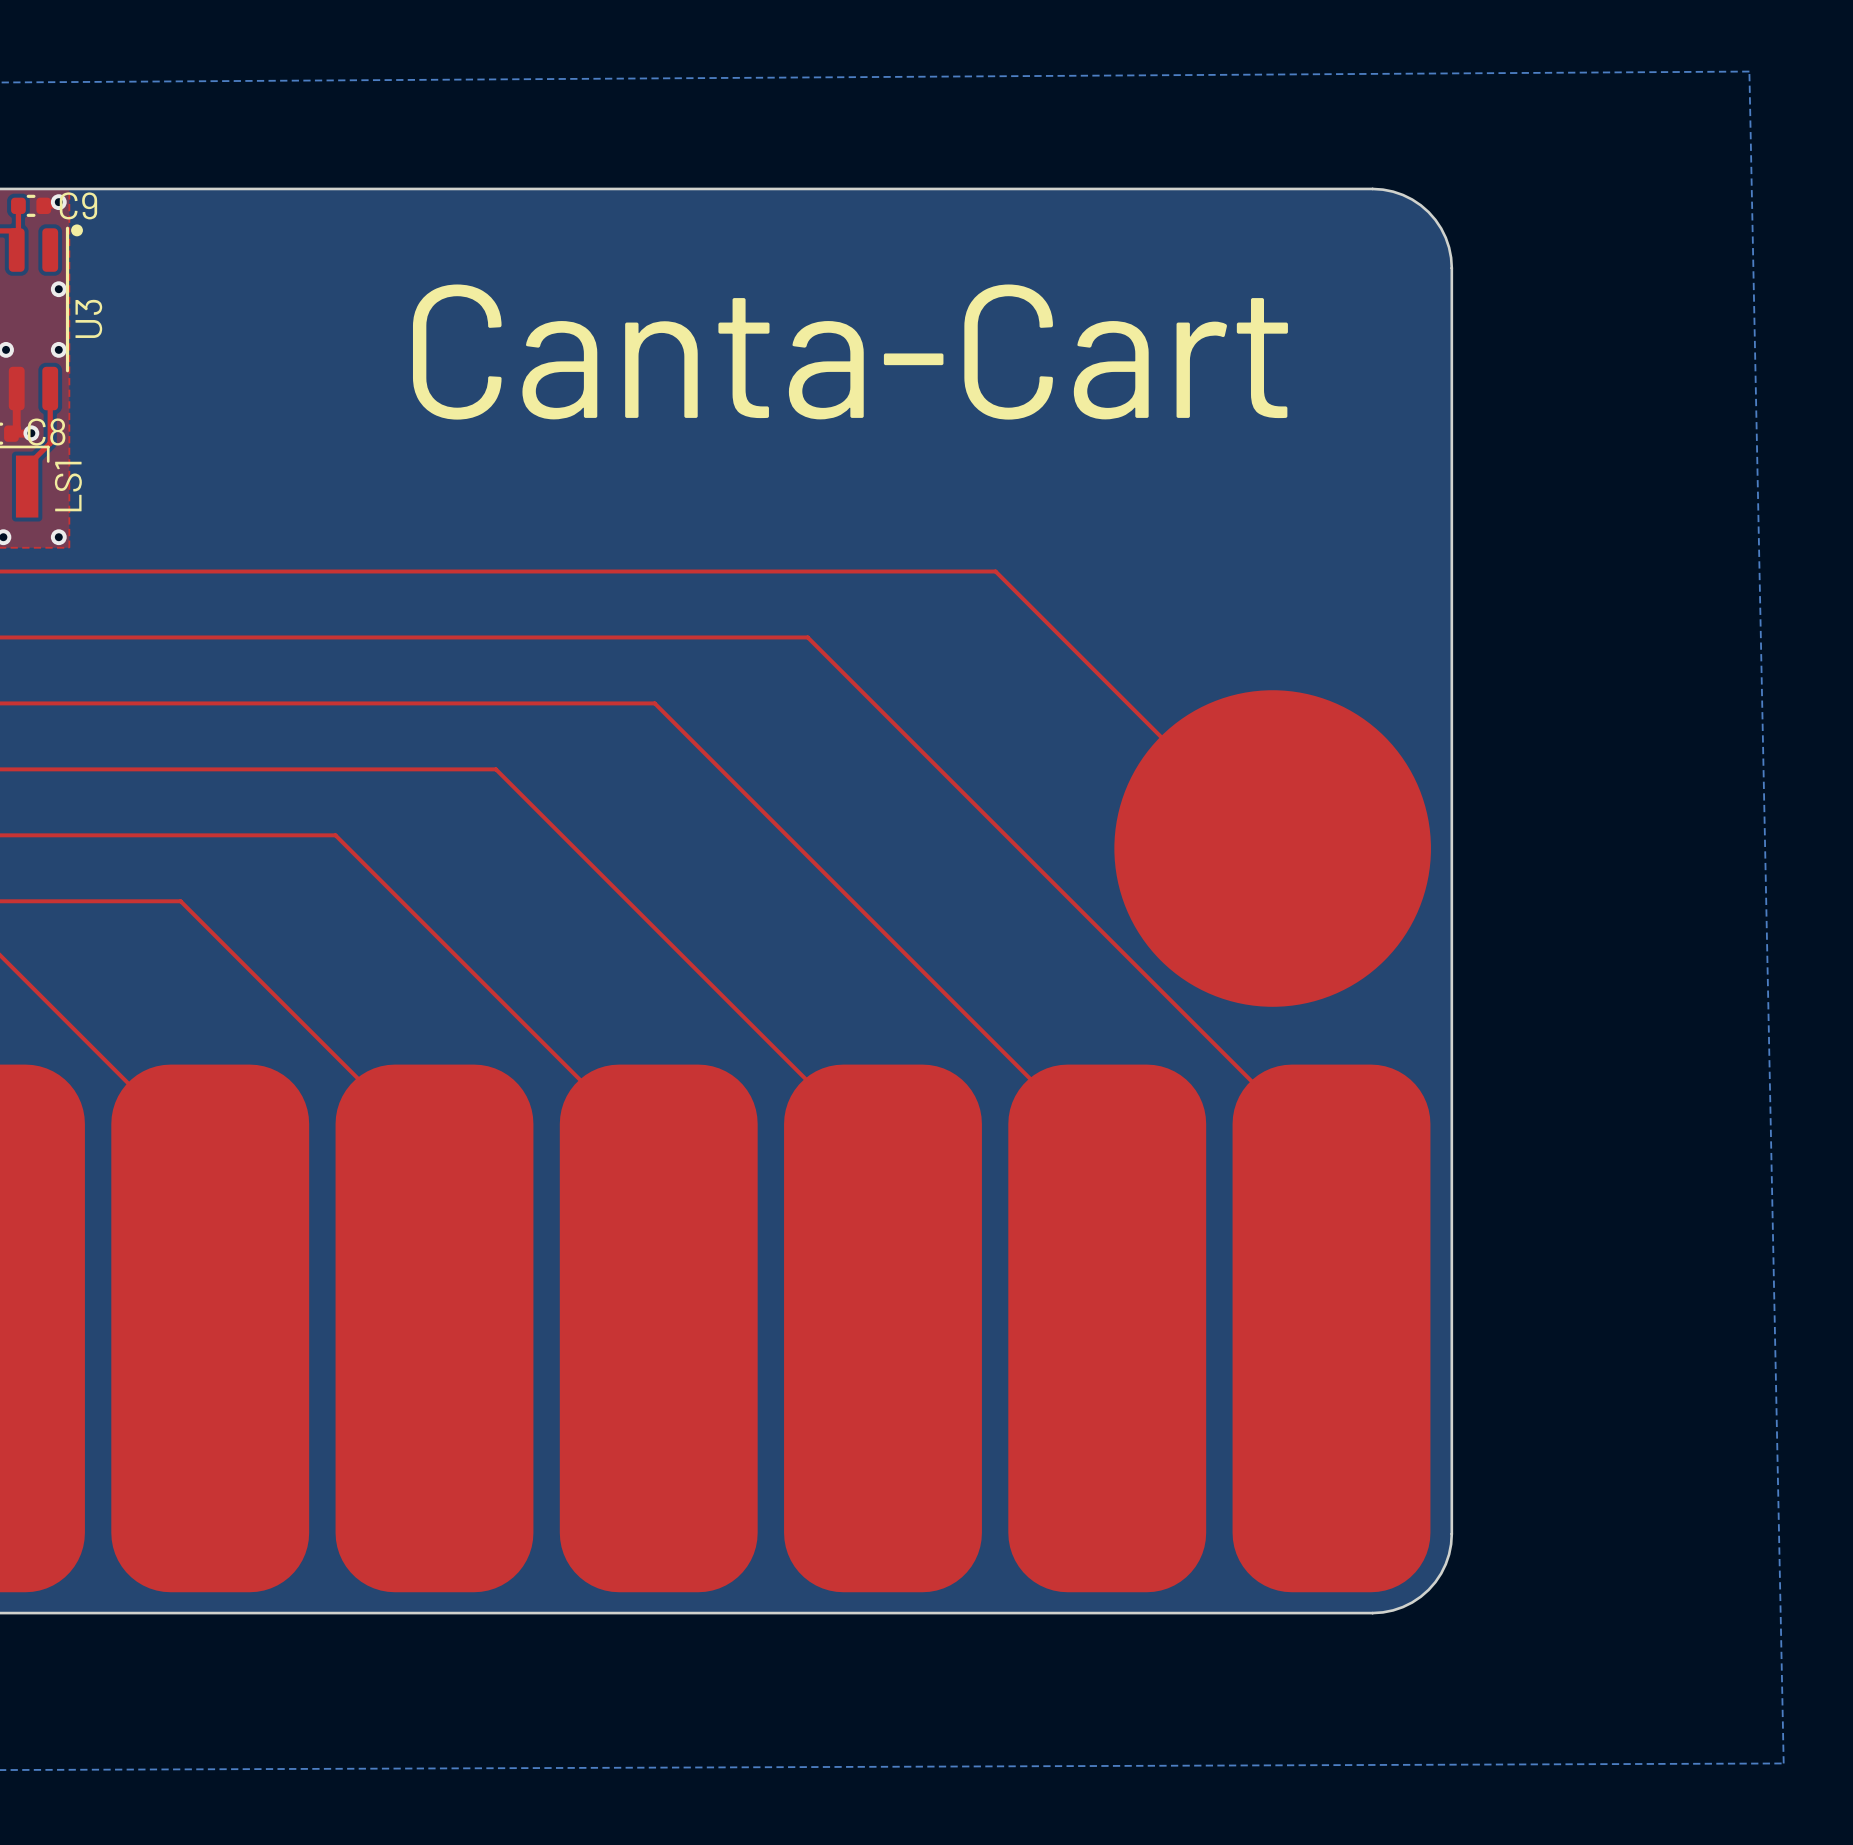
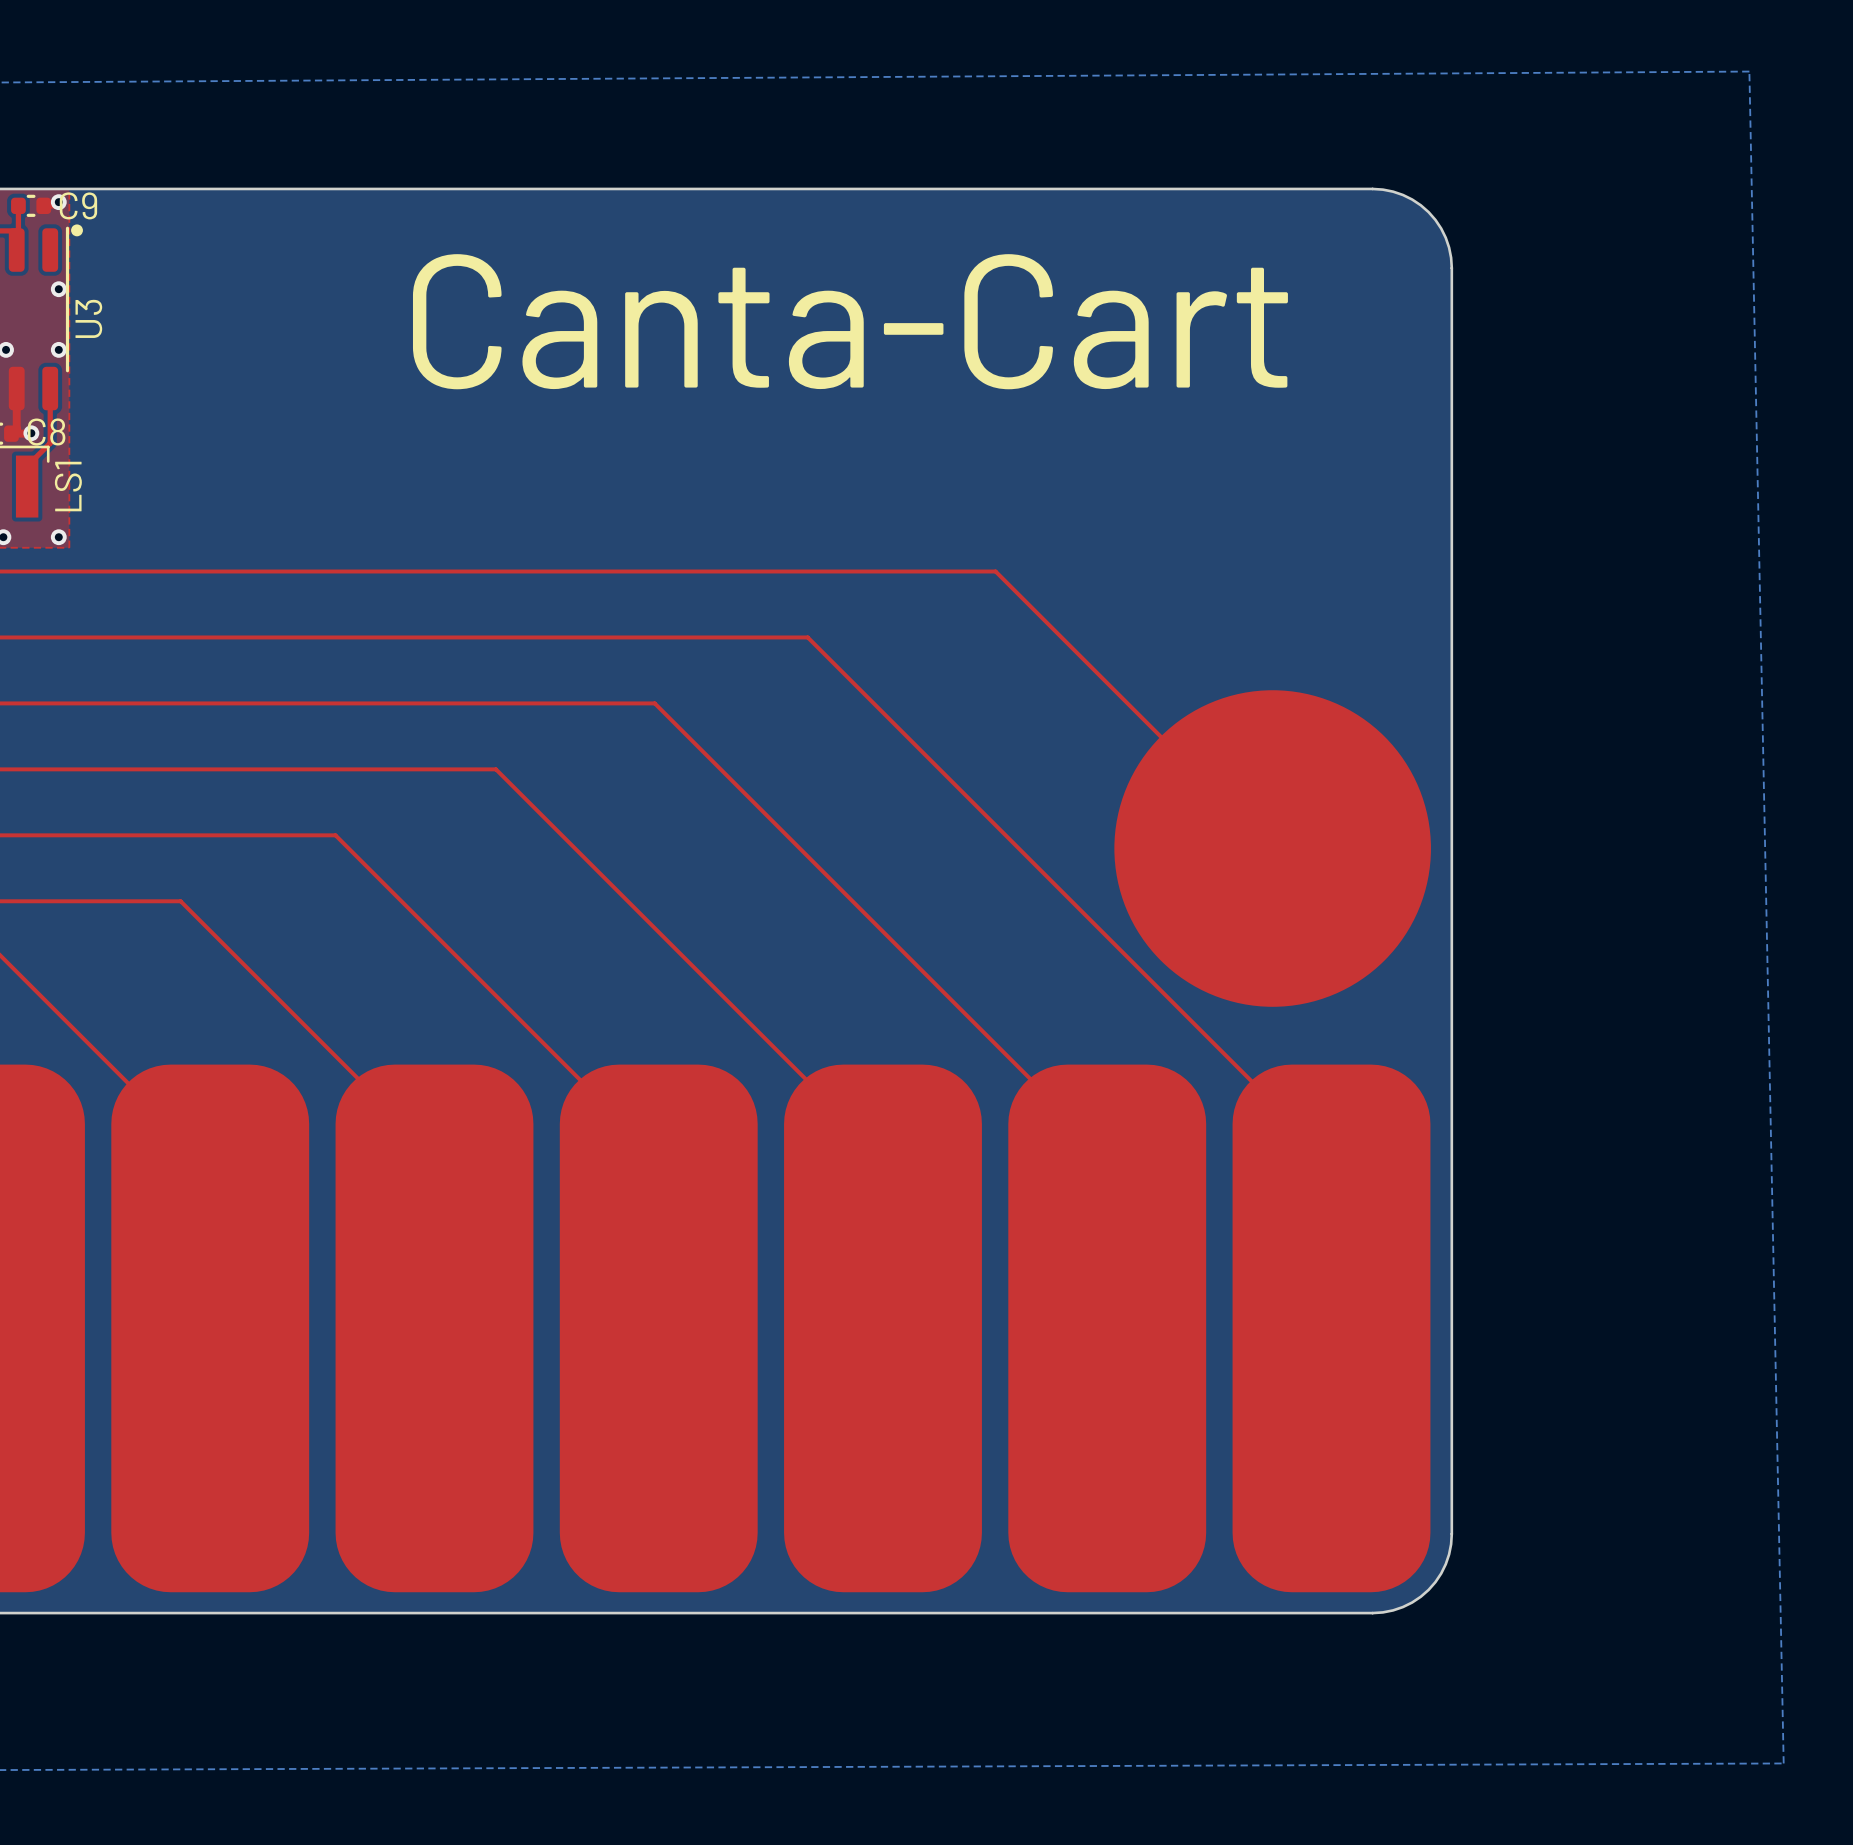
text position: Canta-Cart (850, 352) -> Canta-Cart (850, 321)

